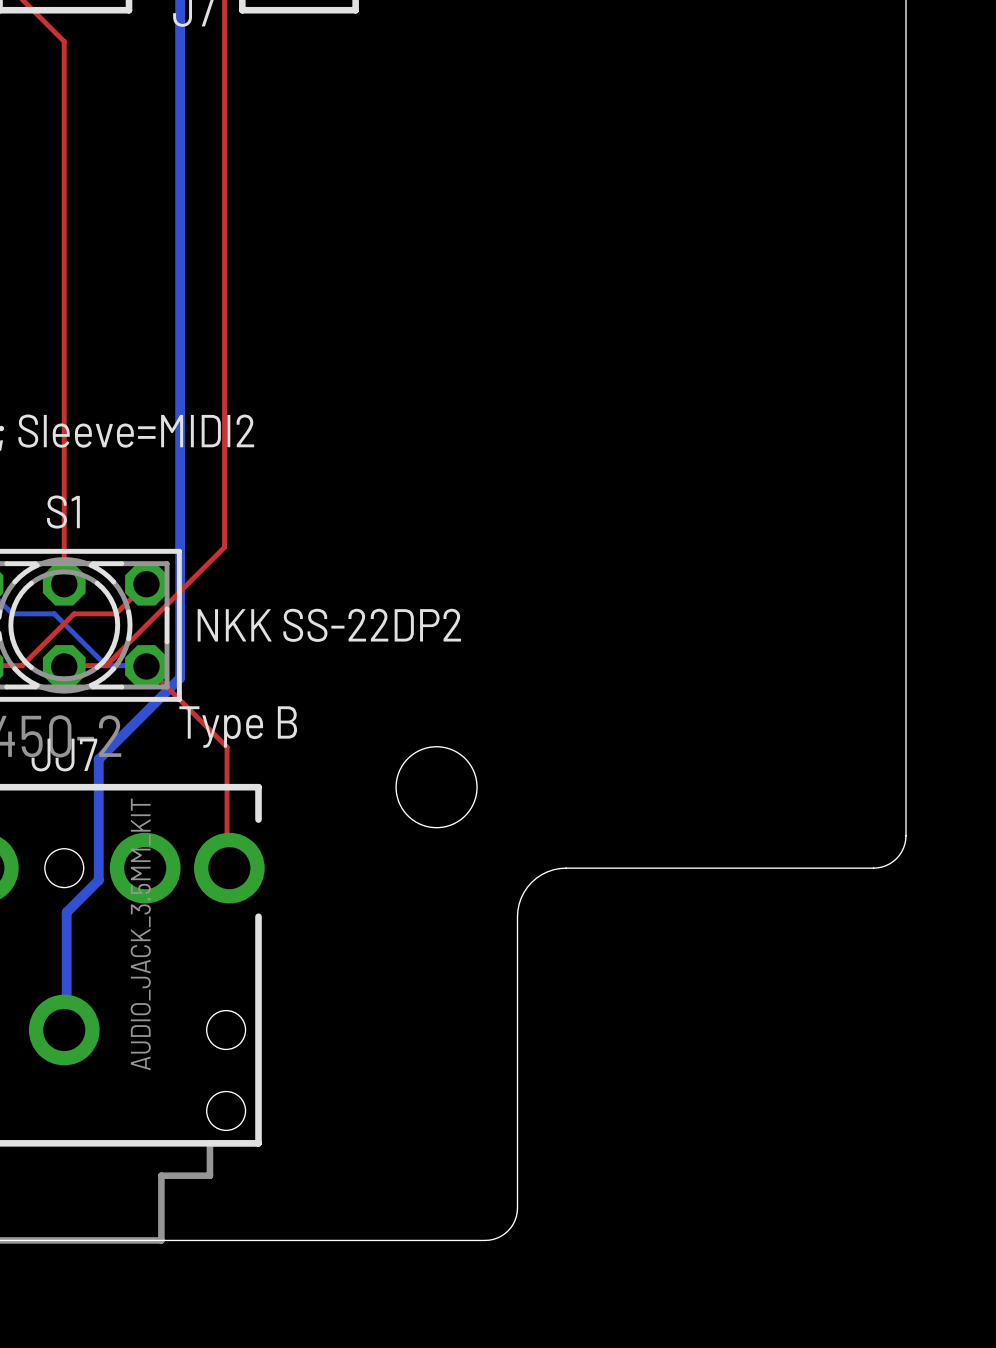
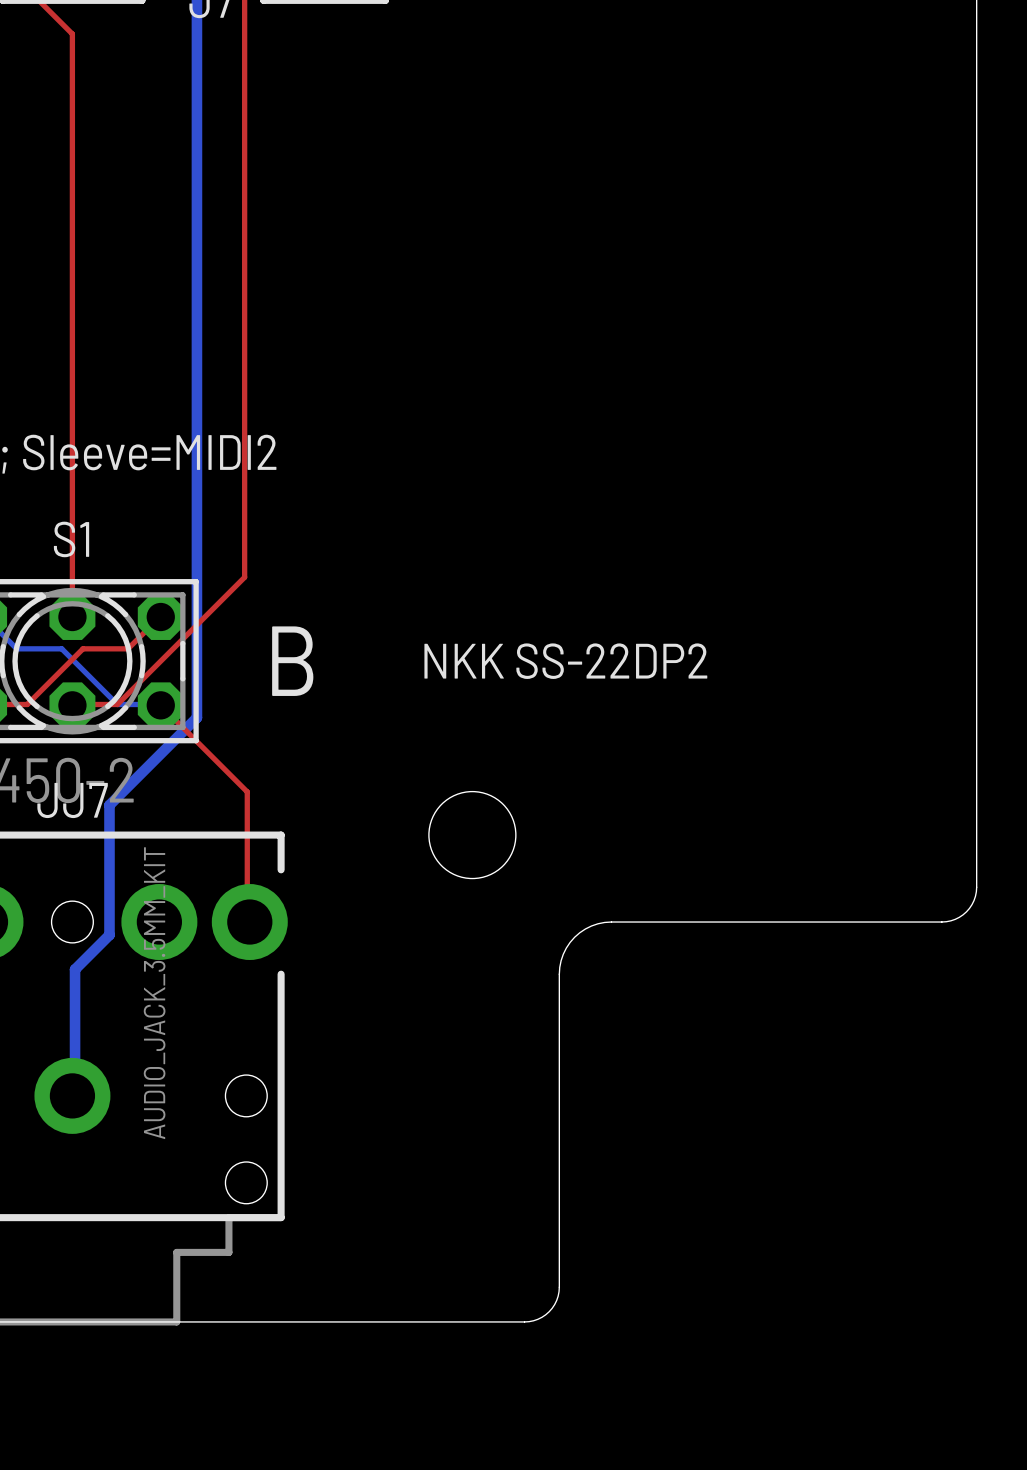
text: none -> B (292, 661)
text position: NKK SS-22DP2 (329, 625) -> NKK SS-22DP2 (565, 661)
text: Type B (238, 727) -> none

